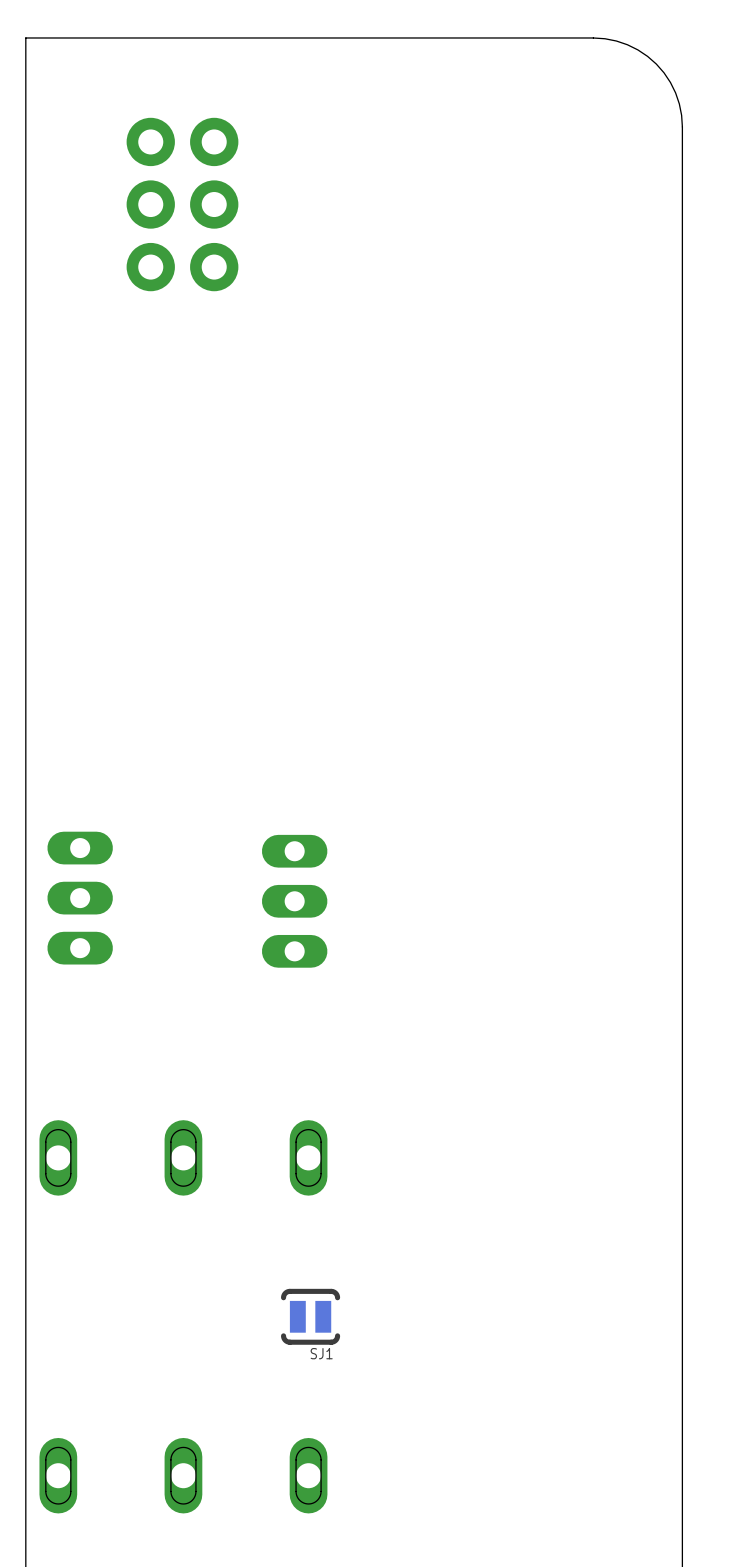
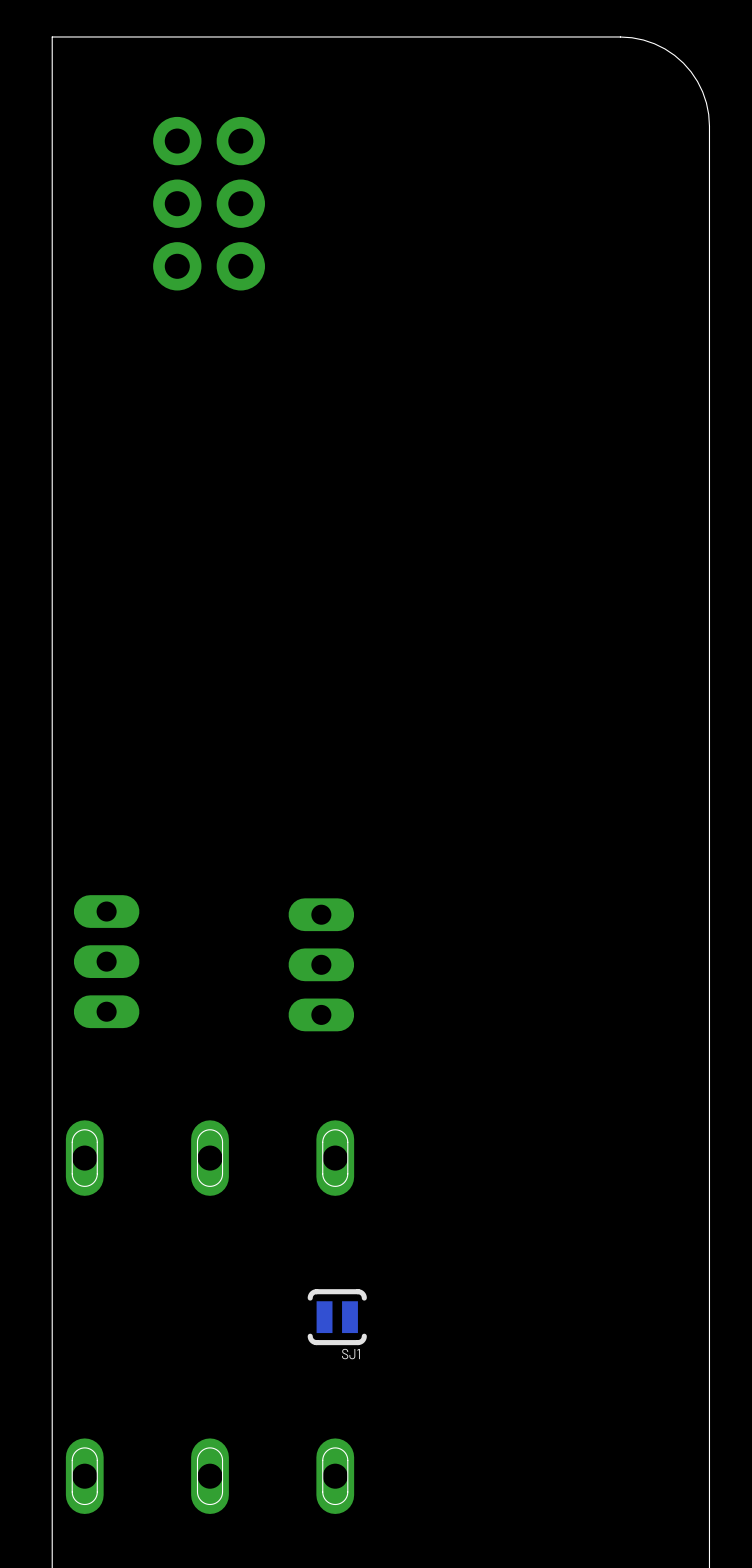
part position: (80, 898) -> (106, 961)
part position: (294, 901) -> (321, 964)

